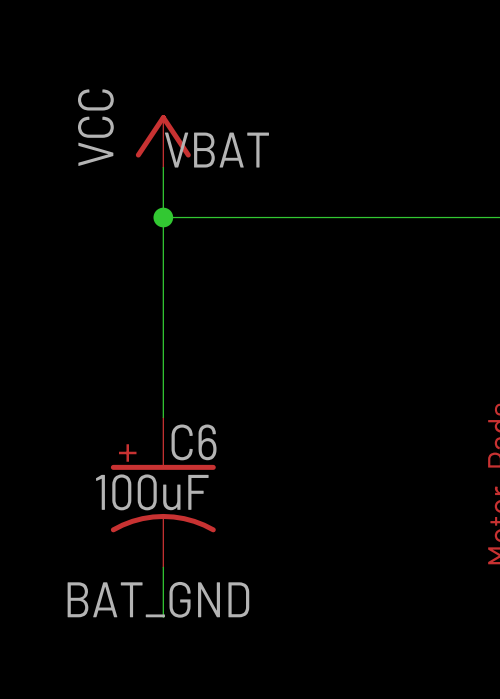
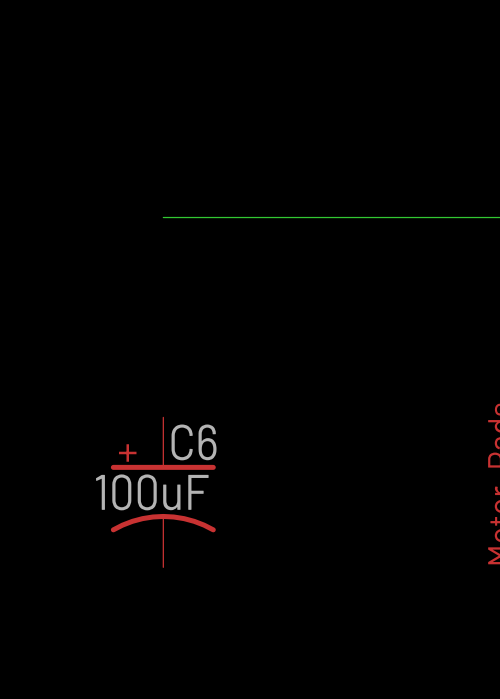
power symbol: VCC (163, 141) -> none
label: VBAT (216, 150) -> none
wire: (163, 167) (163, 417) -> none
junction: (163, 217) -> none
wire: (163, 567) (163, 617) -> none
label: BAT_GND (158, 599) -> none

